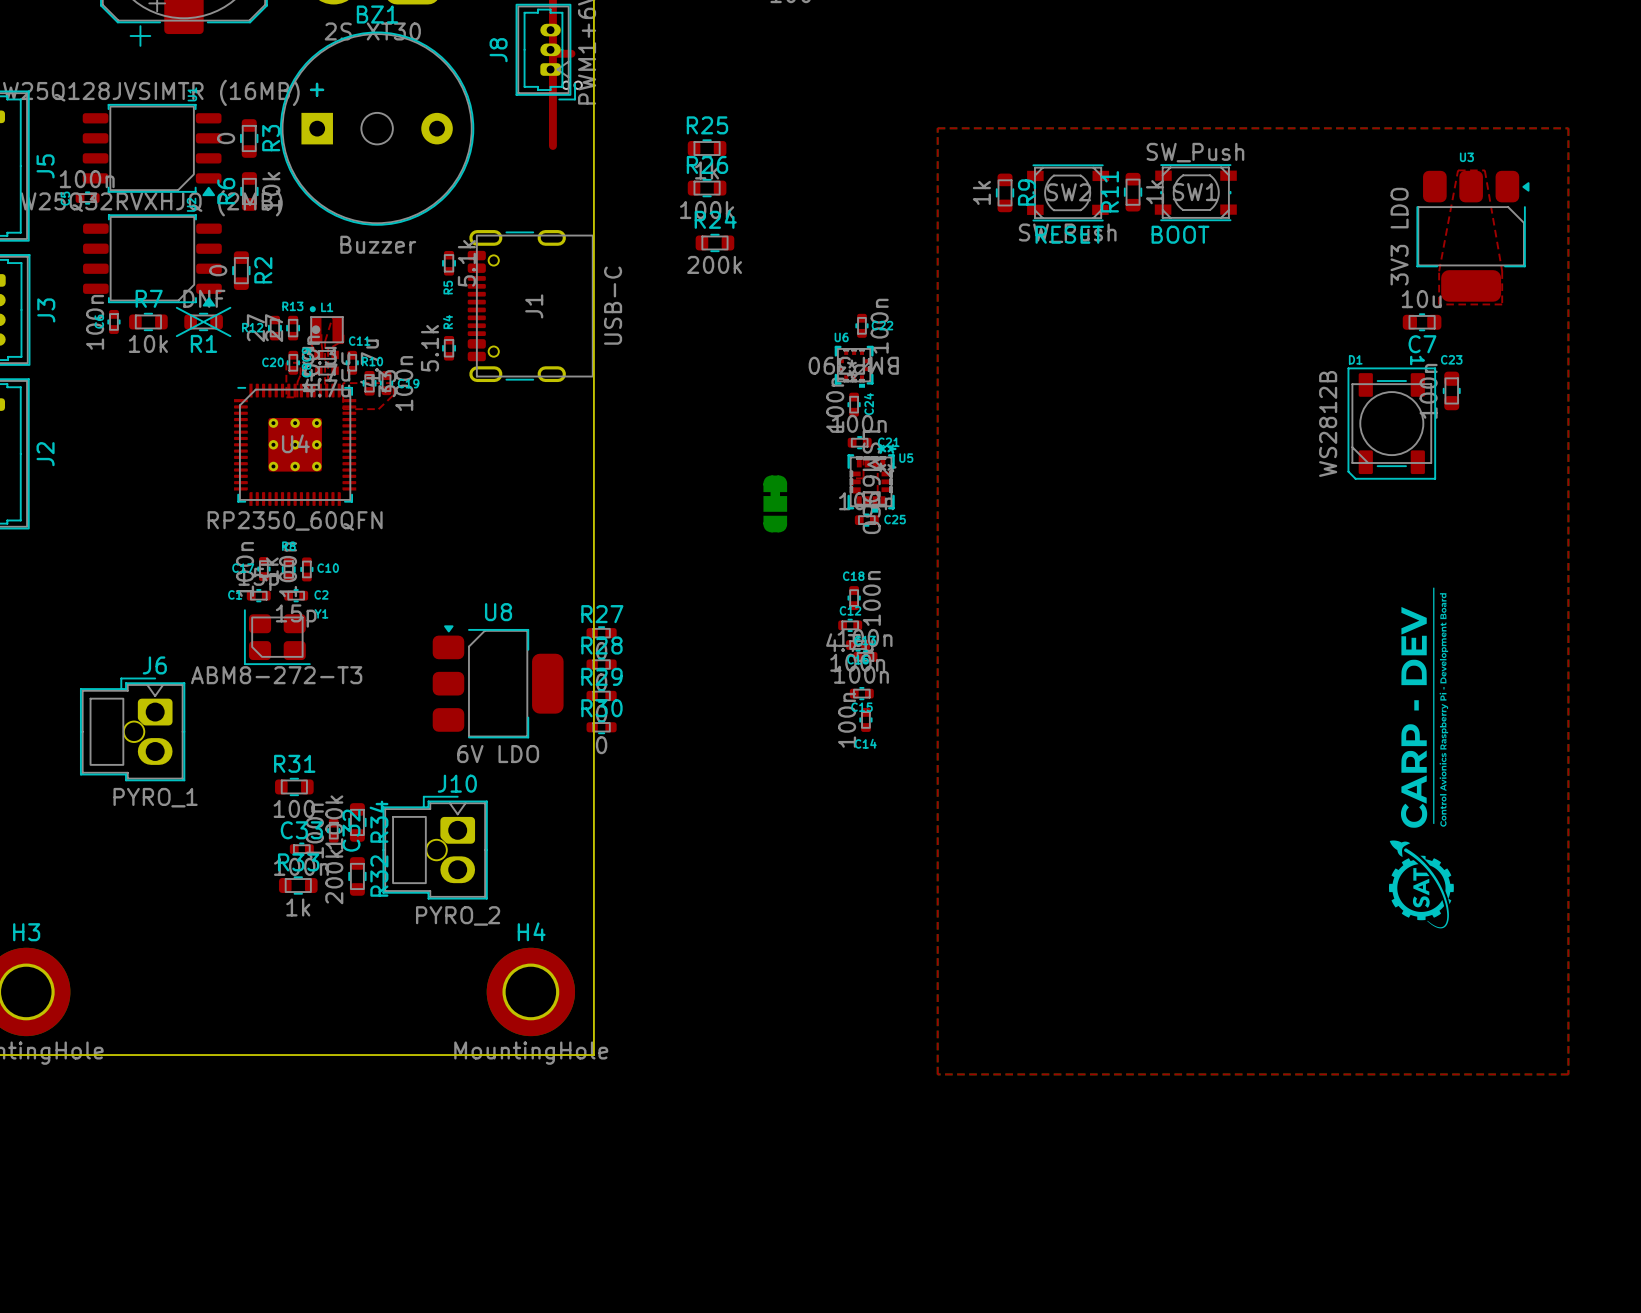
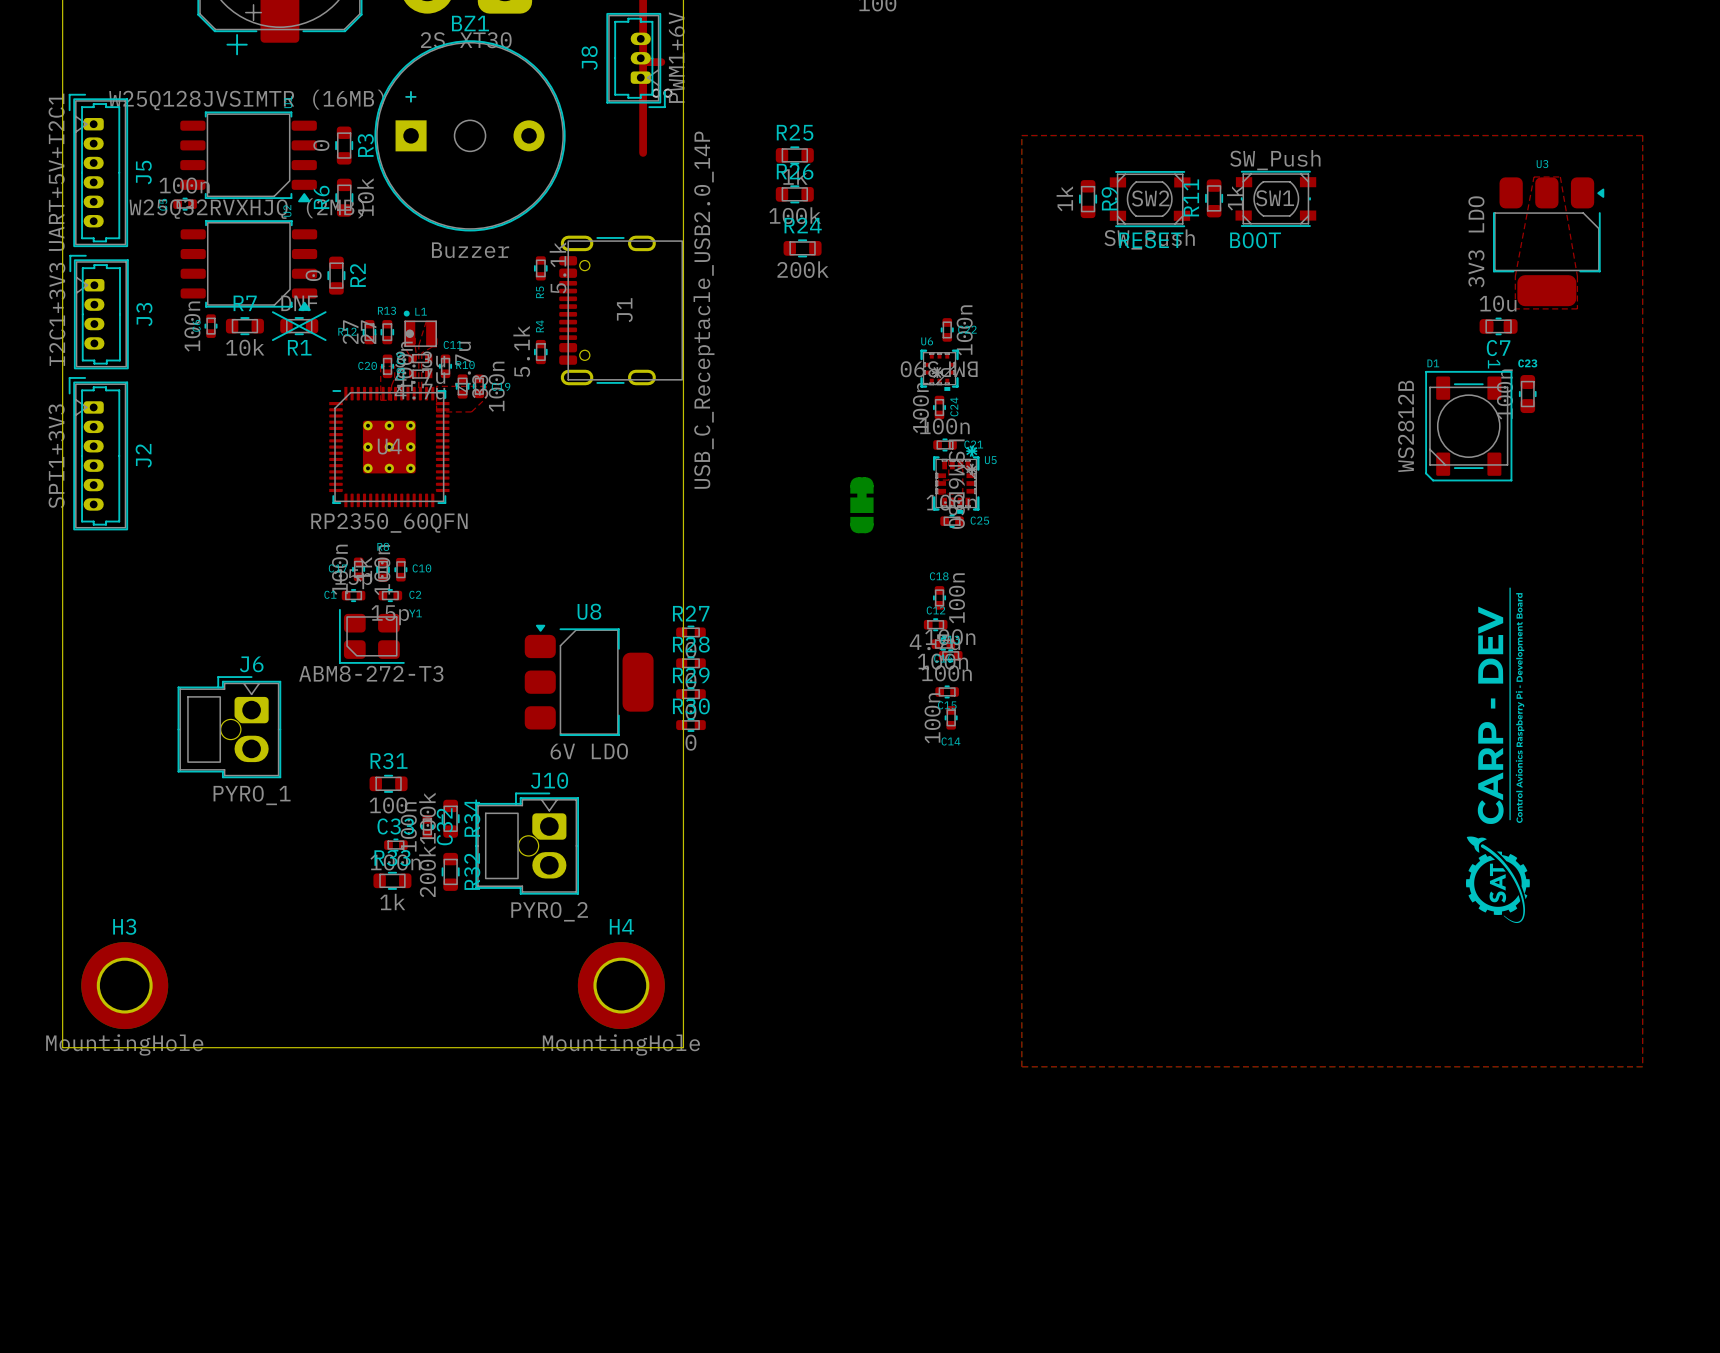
J1 value: USB-C (613, 305) -> USB_C_Receptacle_USB2.0_14P (704, 310)

